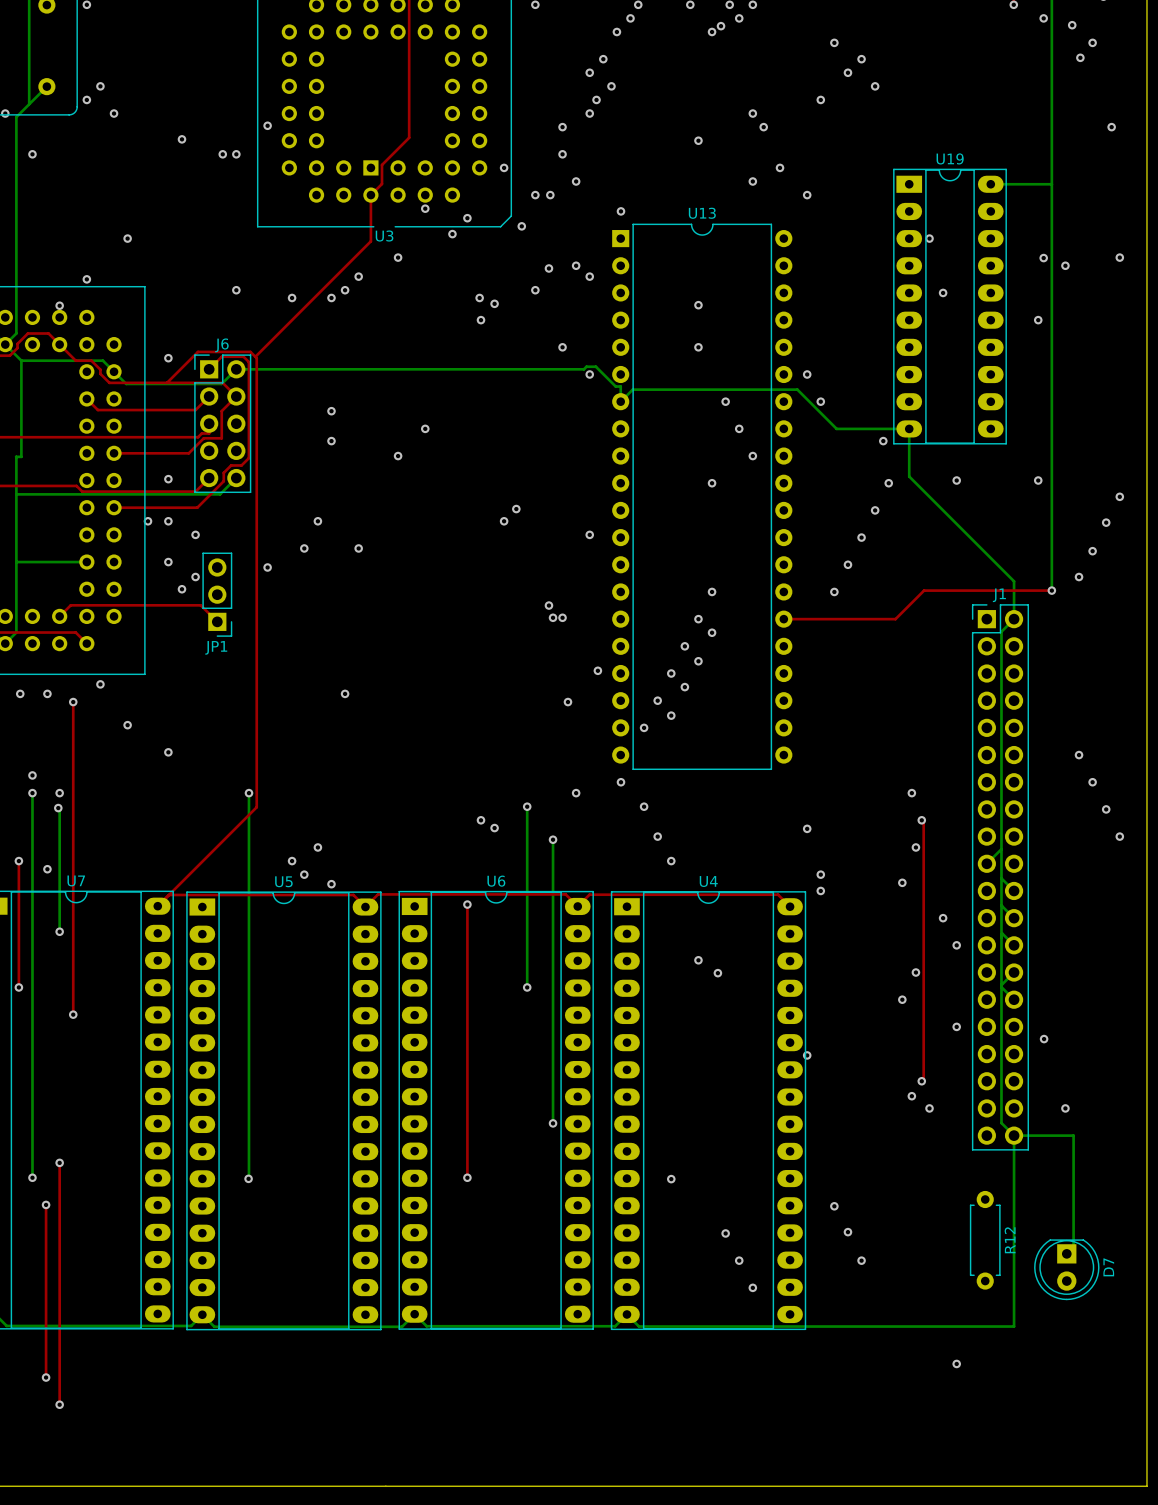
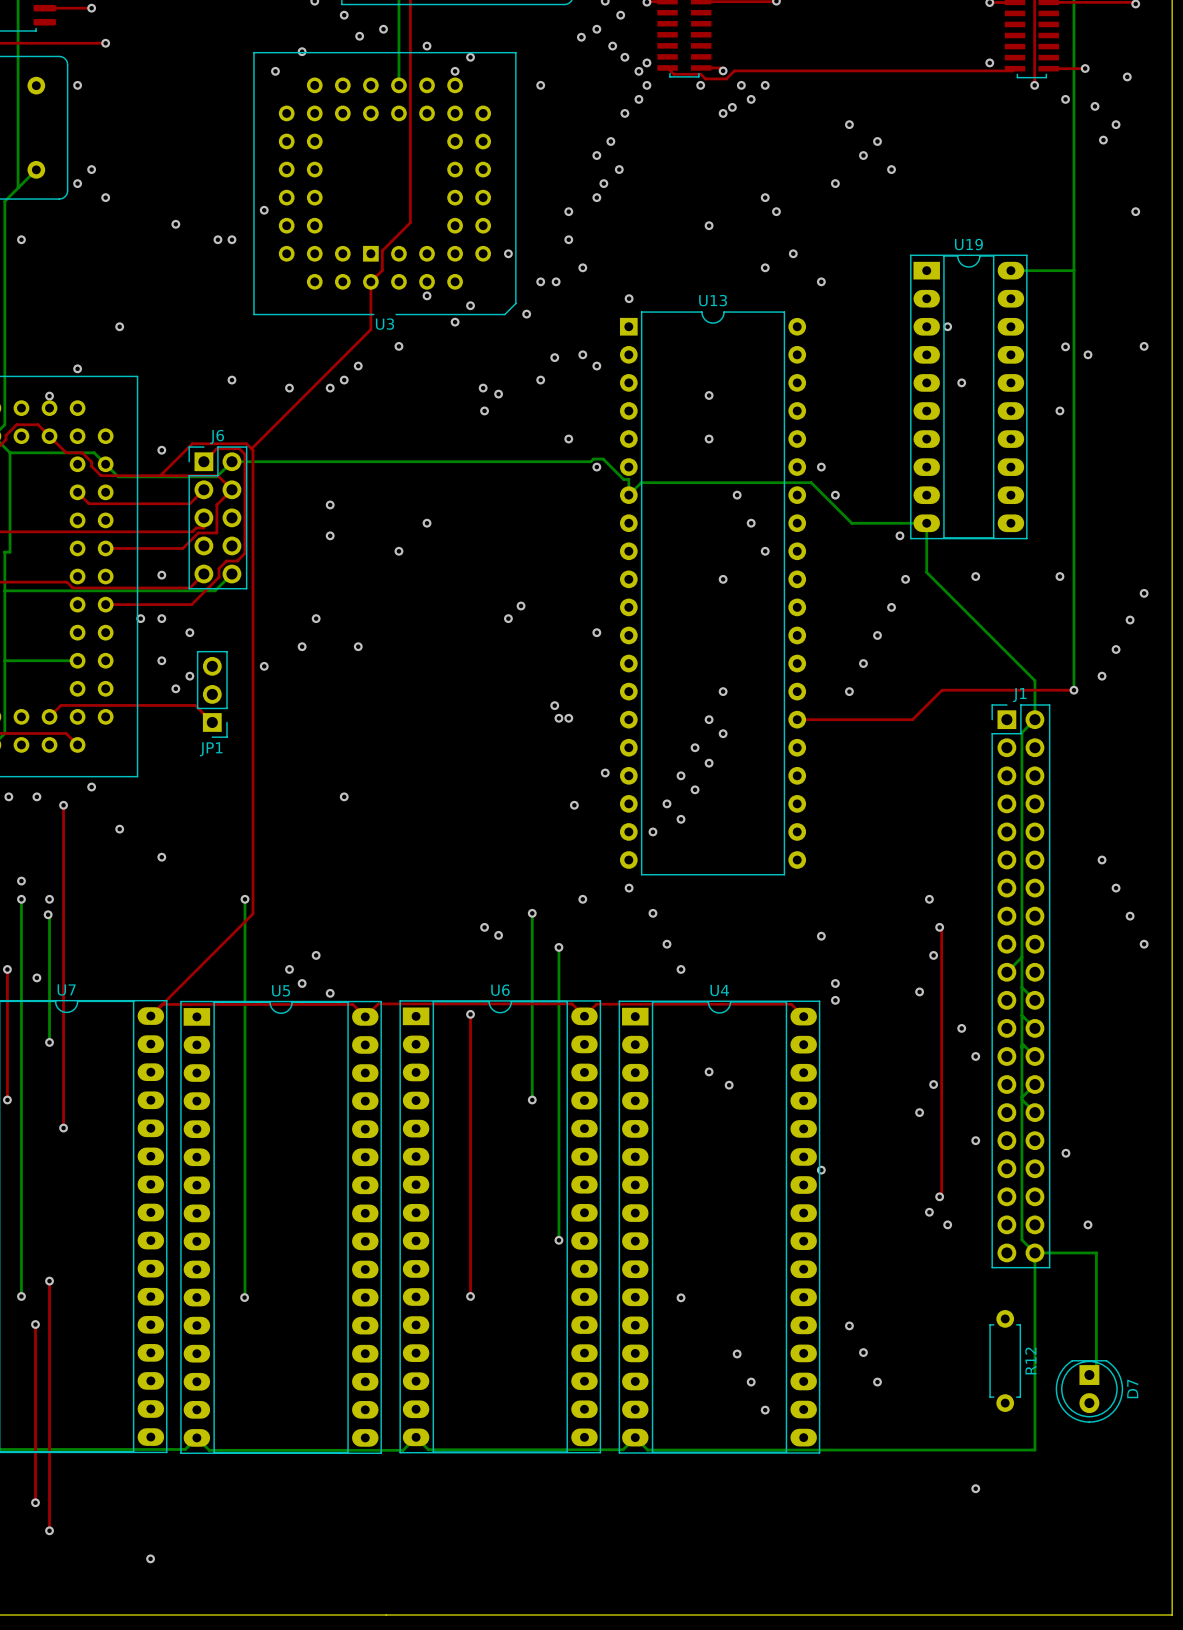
via: none -> (150, 1558)

